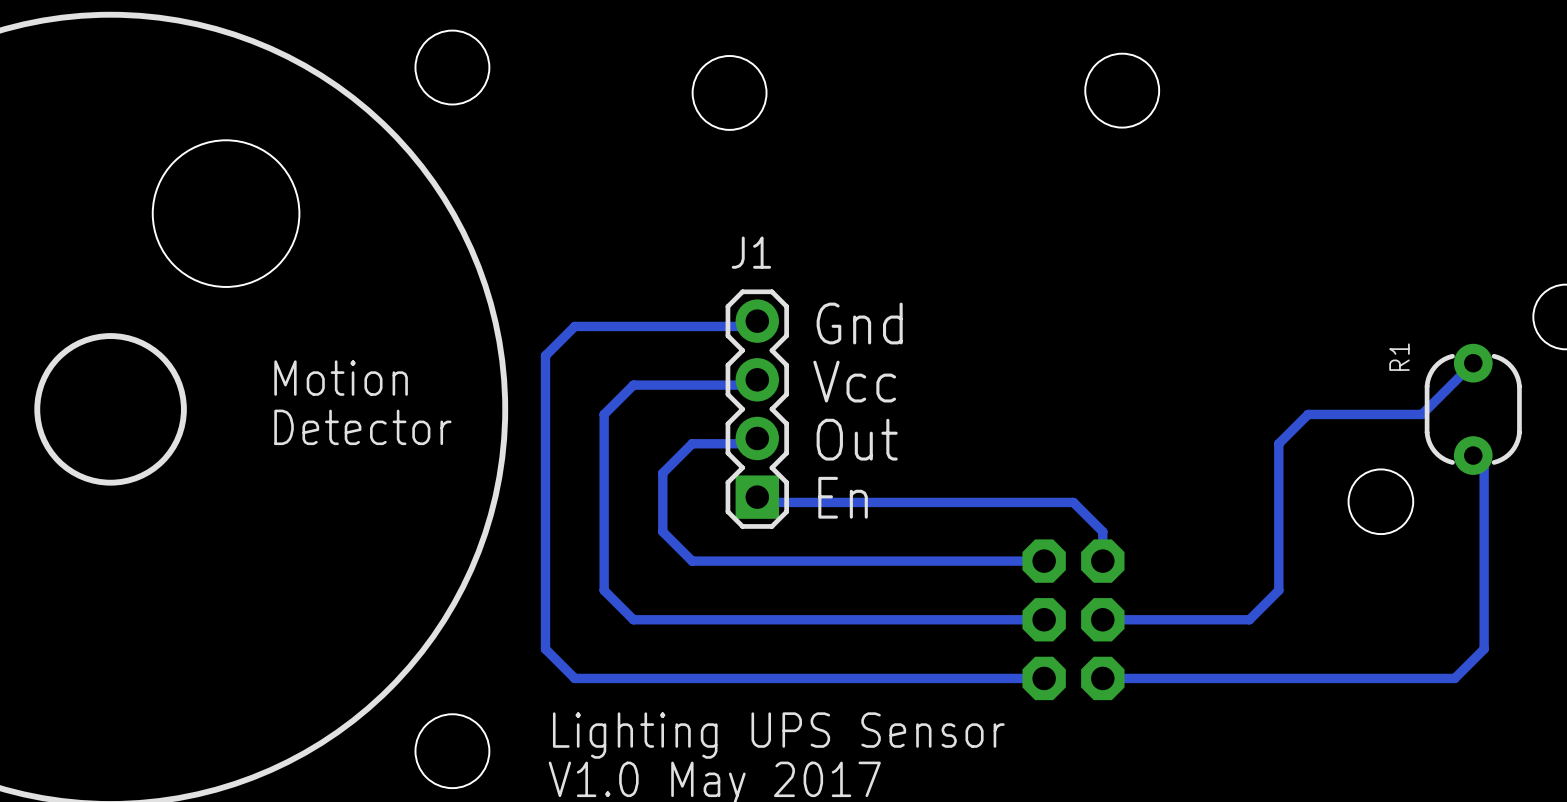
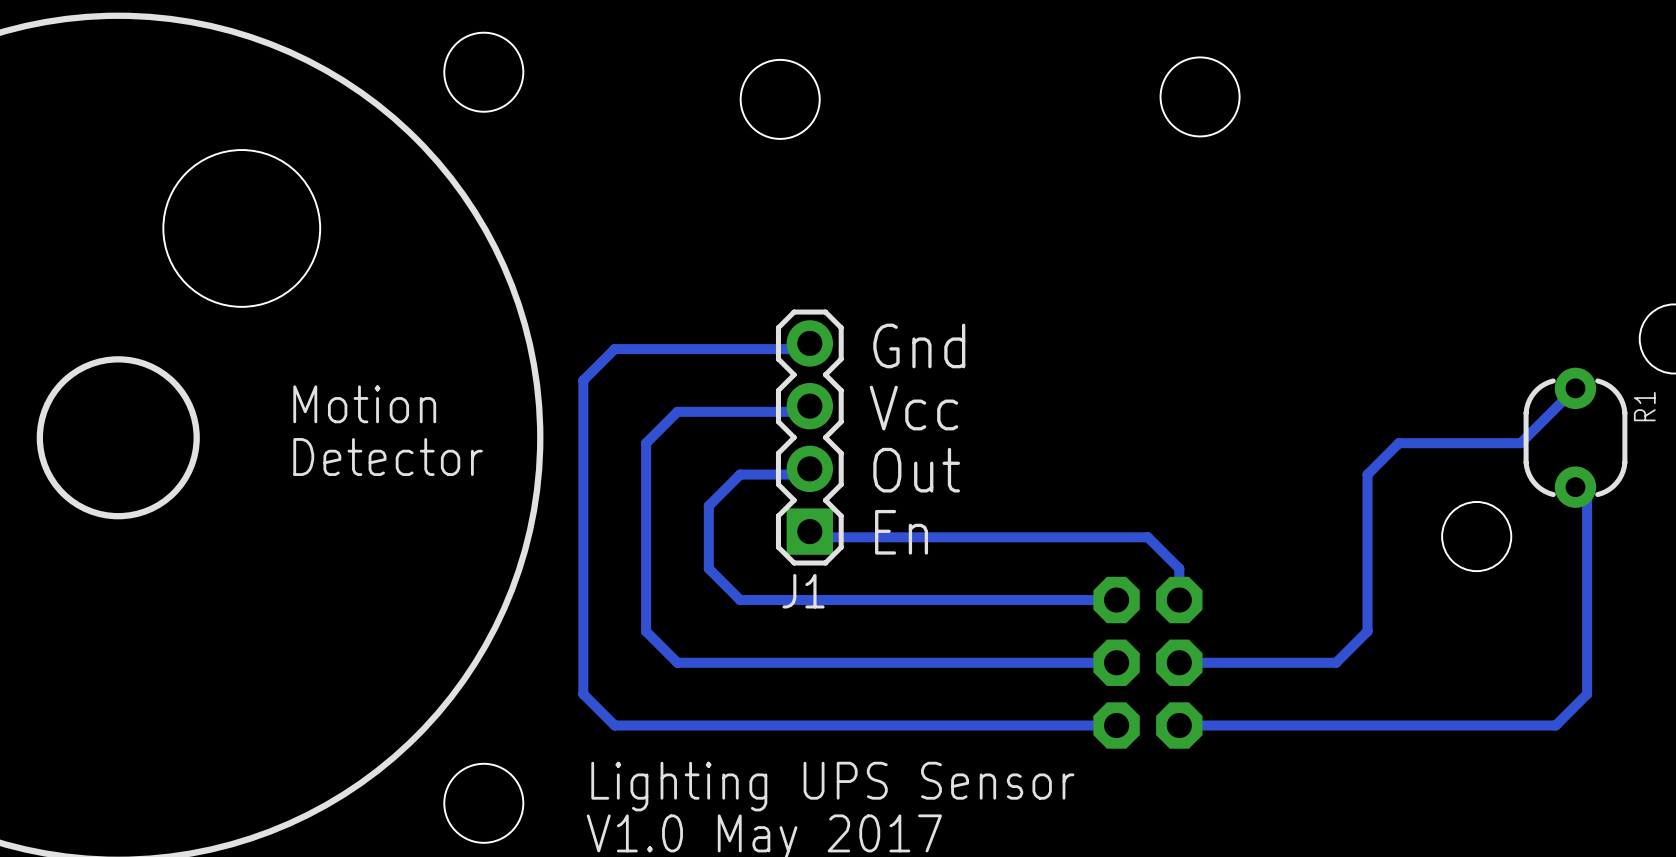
J1 name position: J1 (751, 252) -> J1 (803, 591)
R1 name position: R1 (1399, 357) -> R1 (1644, 406)

